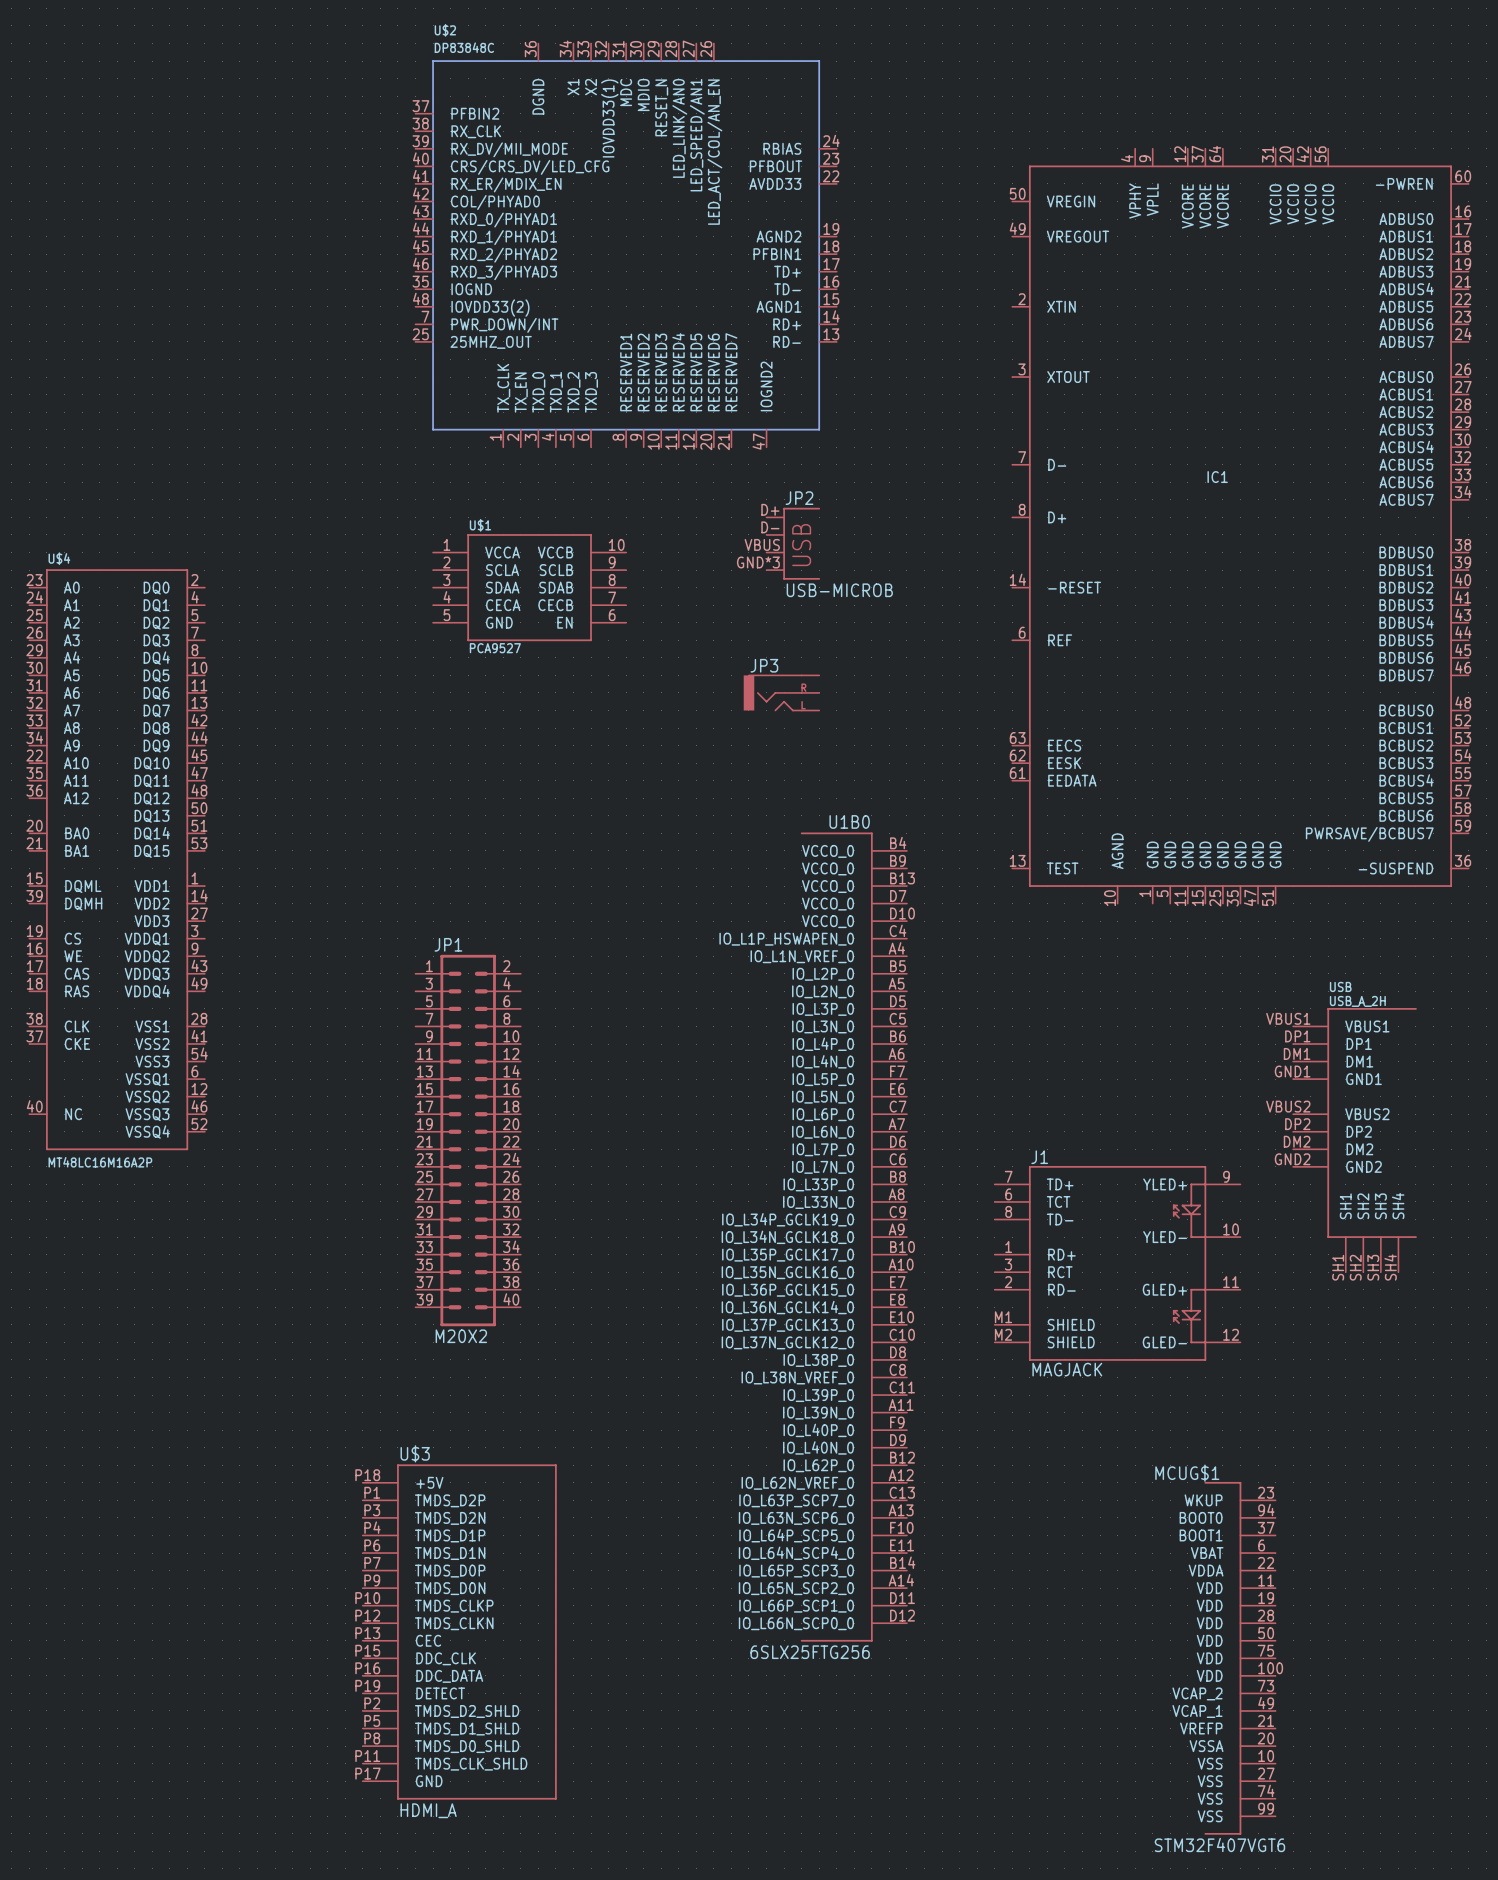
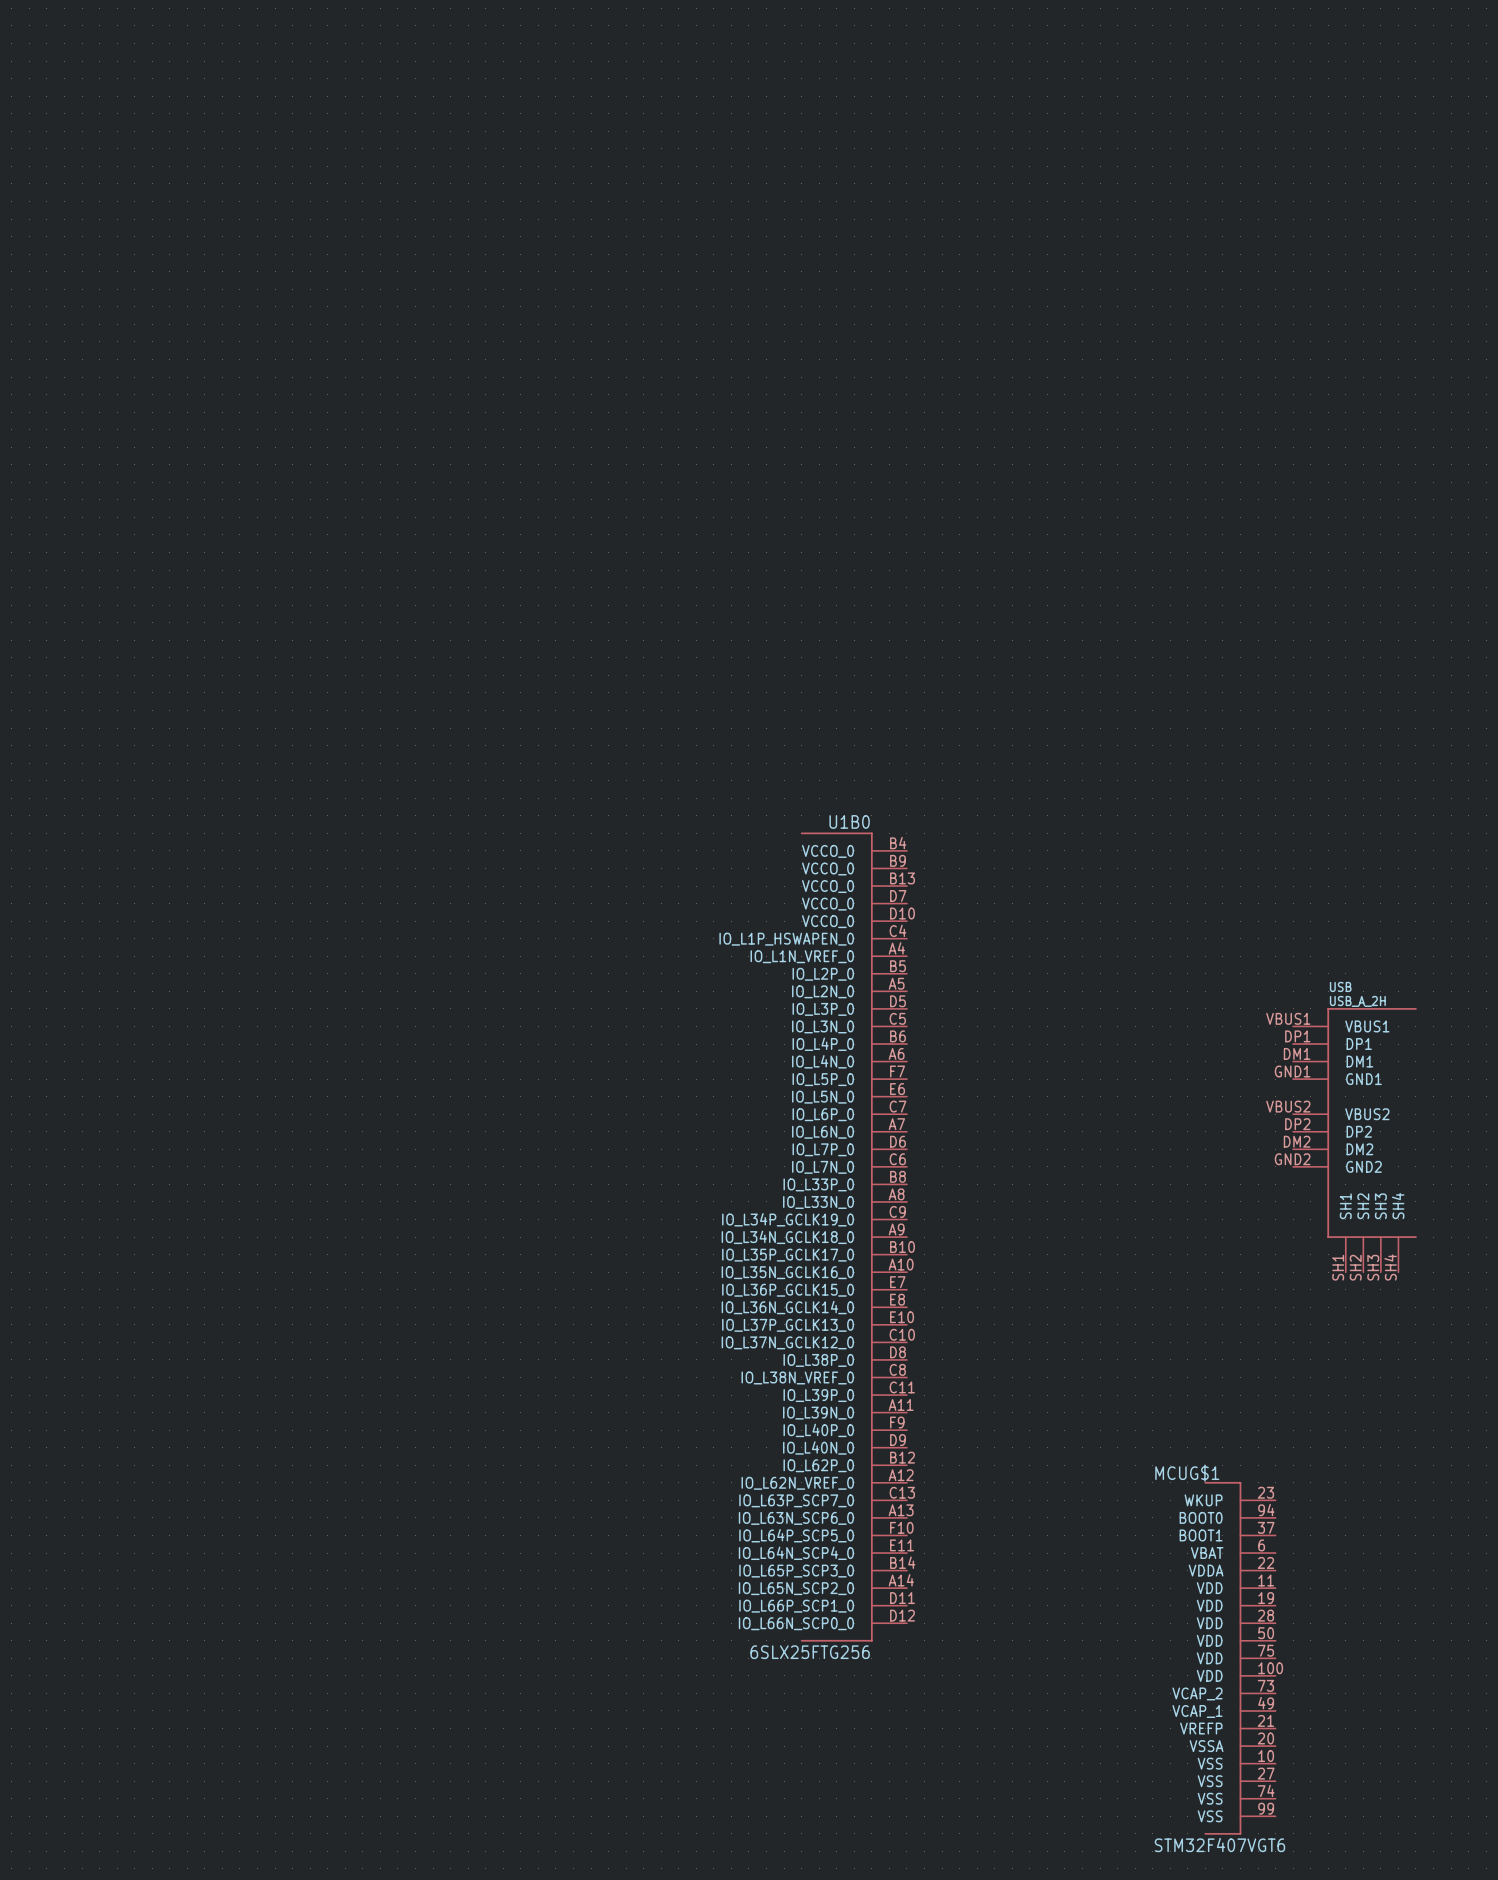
U$2: DP83848C (626, 245) -> none
IC1: (1240, 526) -> none
JP2: USB-MICROB (793, 543) -> none
U$1: PCA9527 (529, 587) -> none
JP3: (781, 692) -> none
U$4: MT48LC16M16A2P (117, 859) -> none
JP1: M20X2 (468, 1140) -> none
J1: MAGJACK (1117, 1263) -> none
U$3: HDMI_A (459, 1632) -> none

